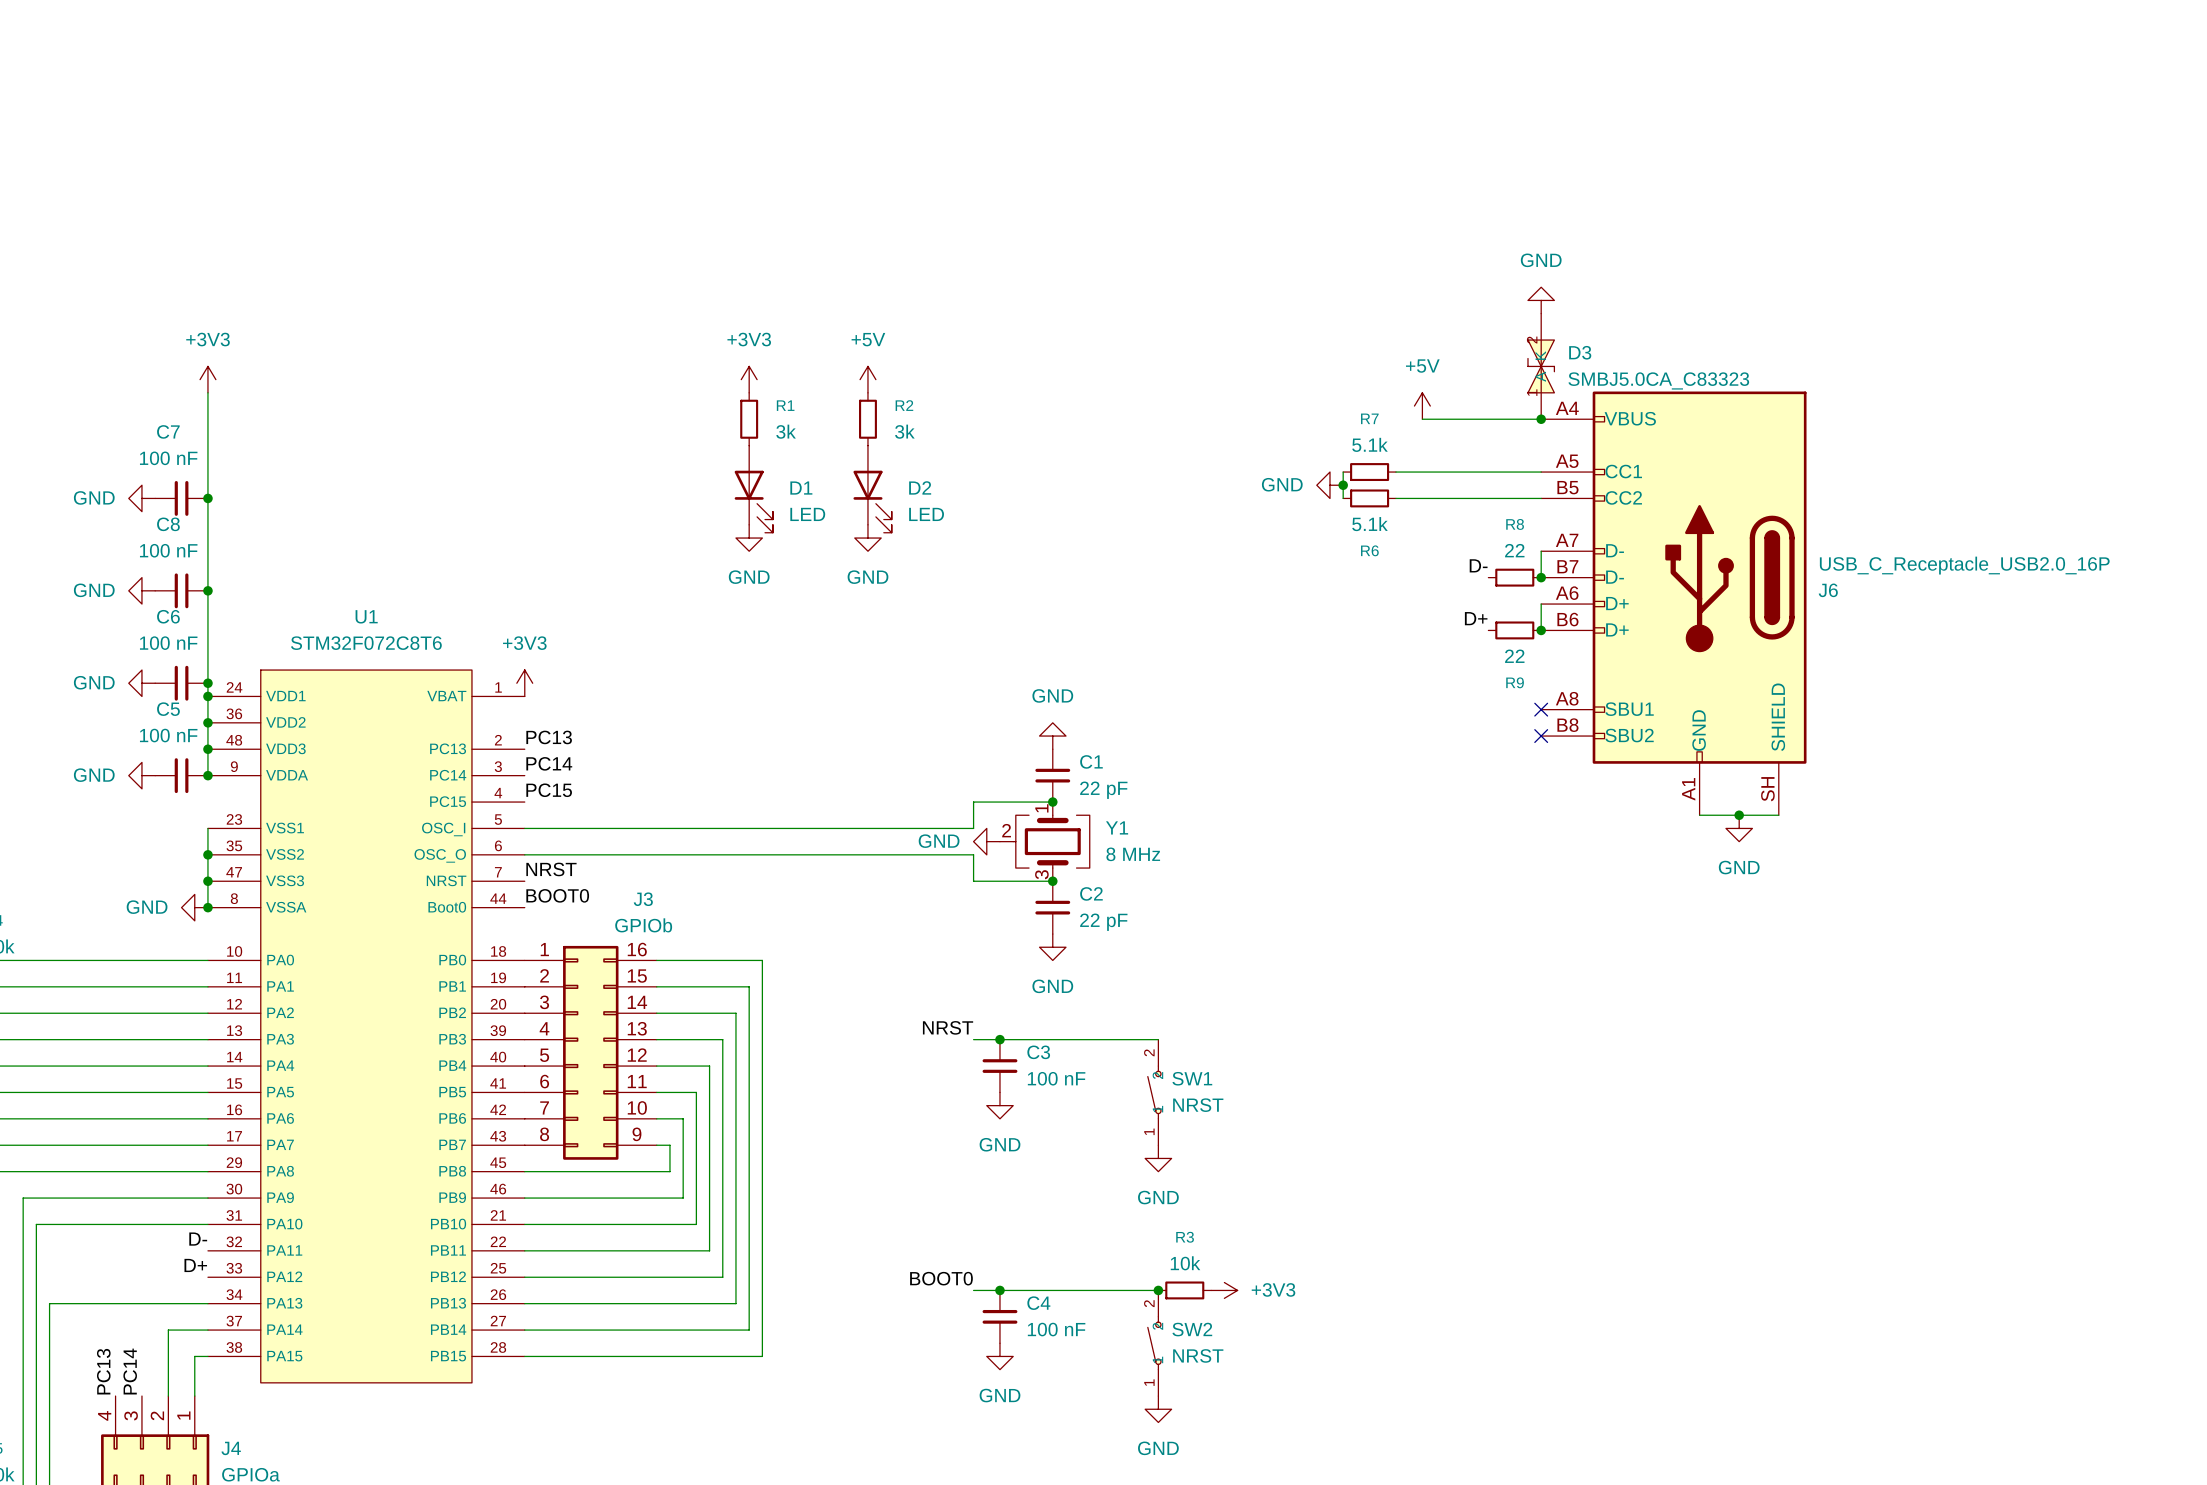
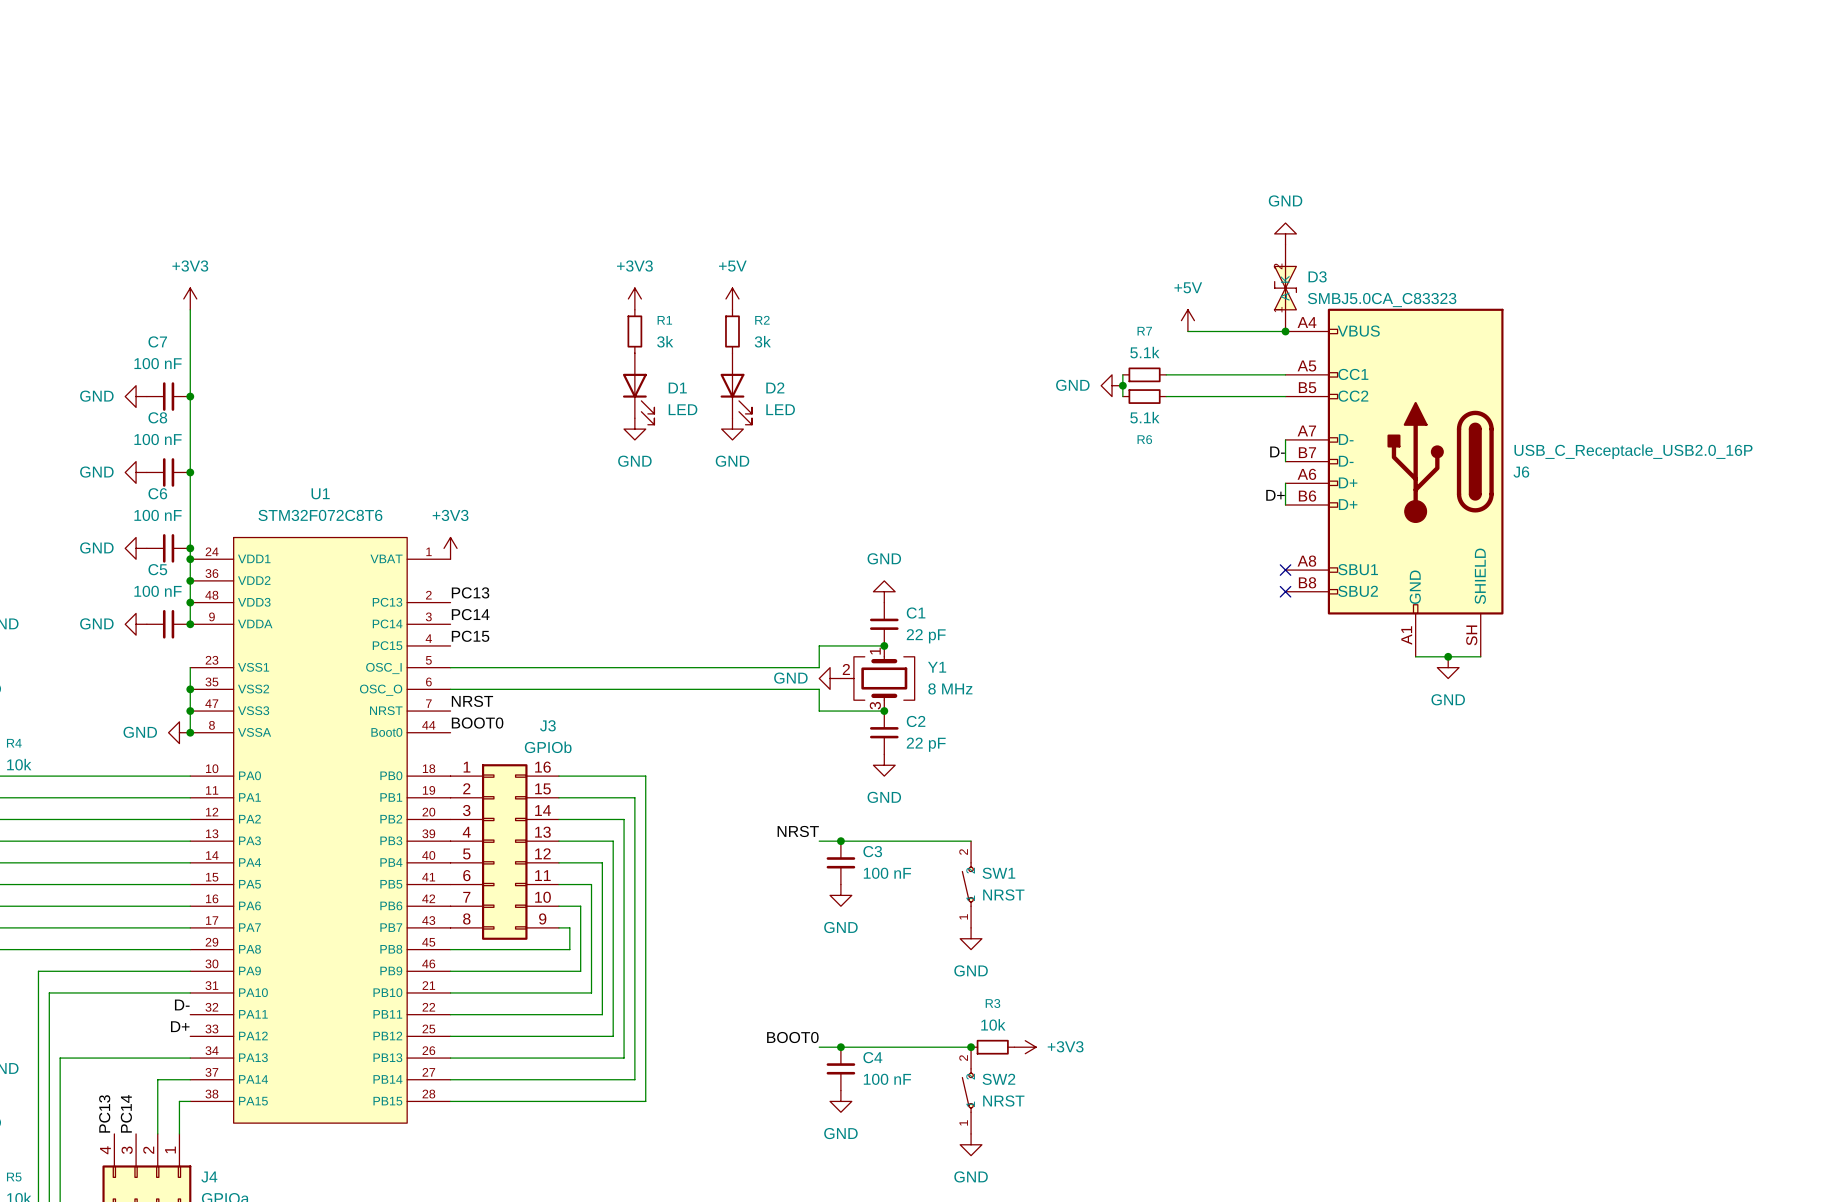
label position: D- (1478, 565) -> D- (1277, 451)
R8: 22 (1514, 577) -> none
junction: (1541, 577) -> none
label position: D+ (1476, 618) -> D+ (1275, 495)
R9: 22 (1514, 630) -> none
junction: (1541, 630) -> none

